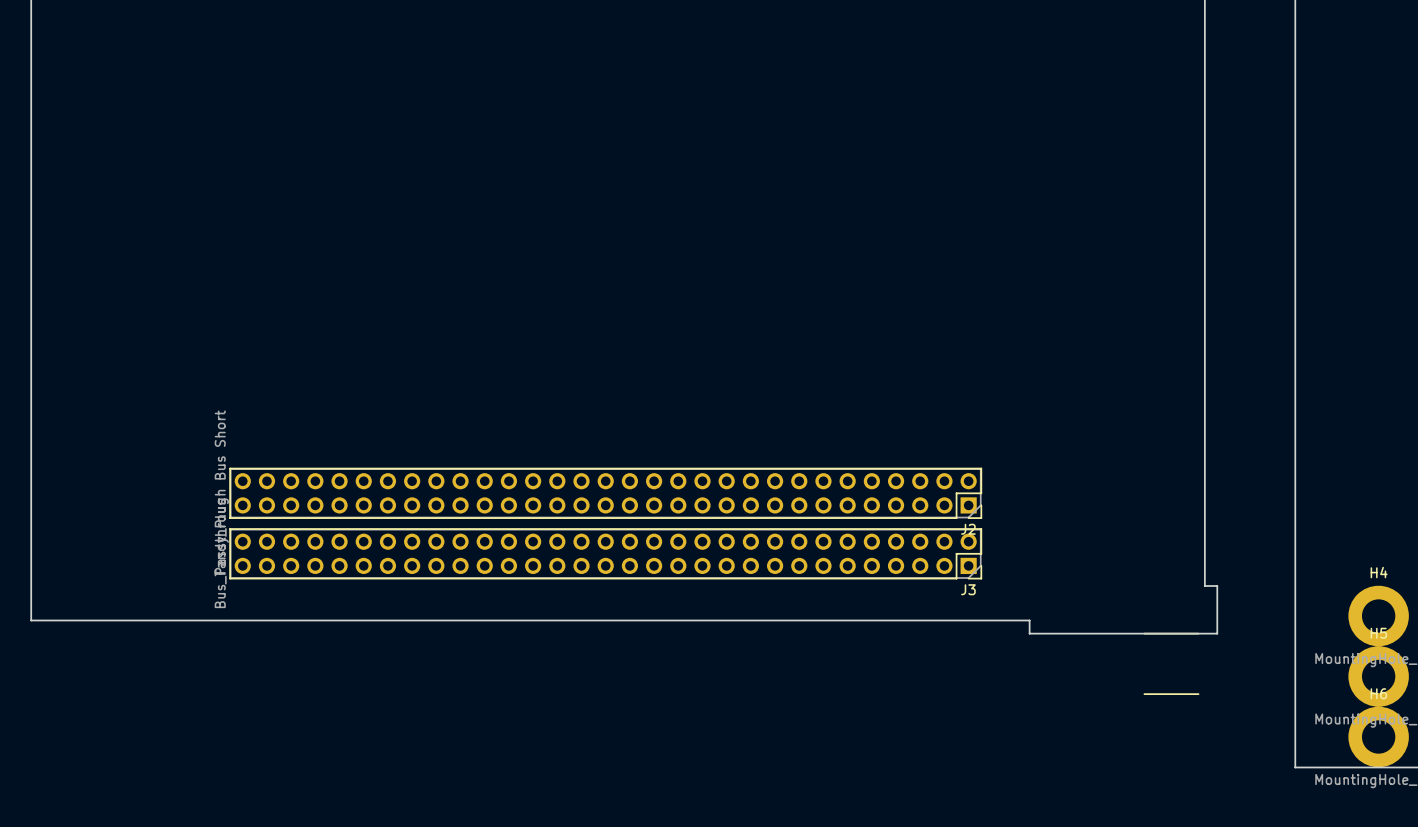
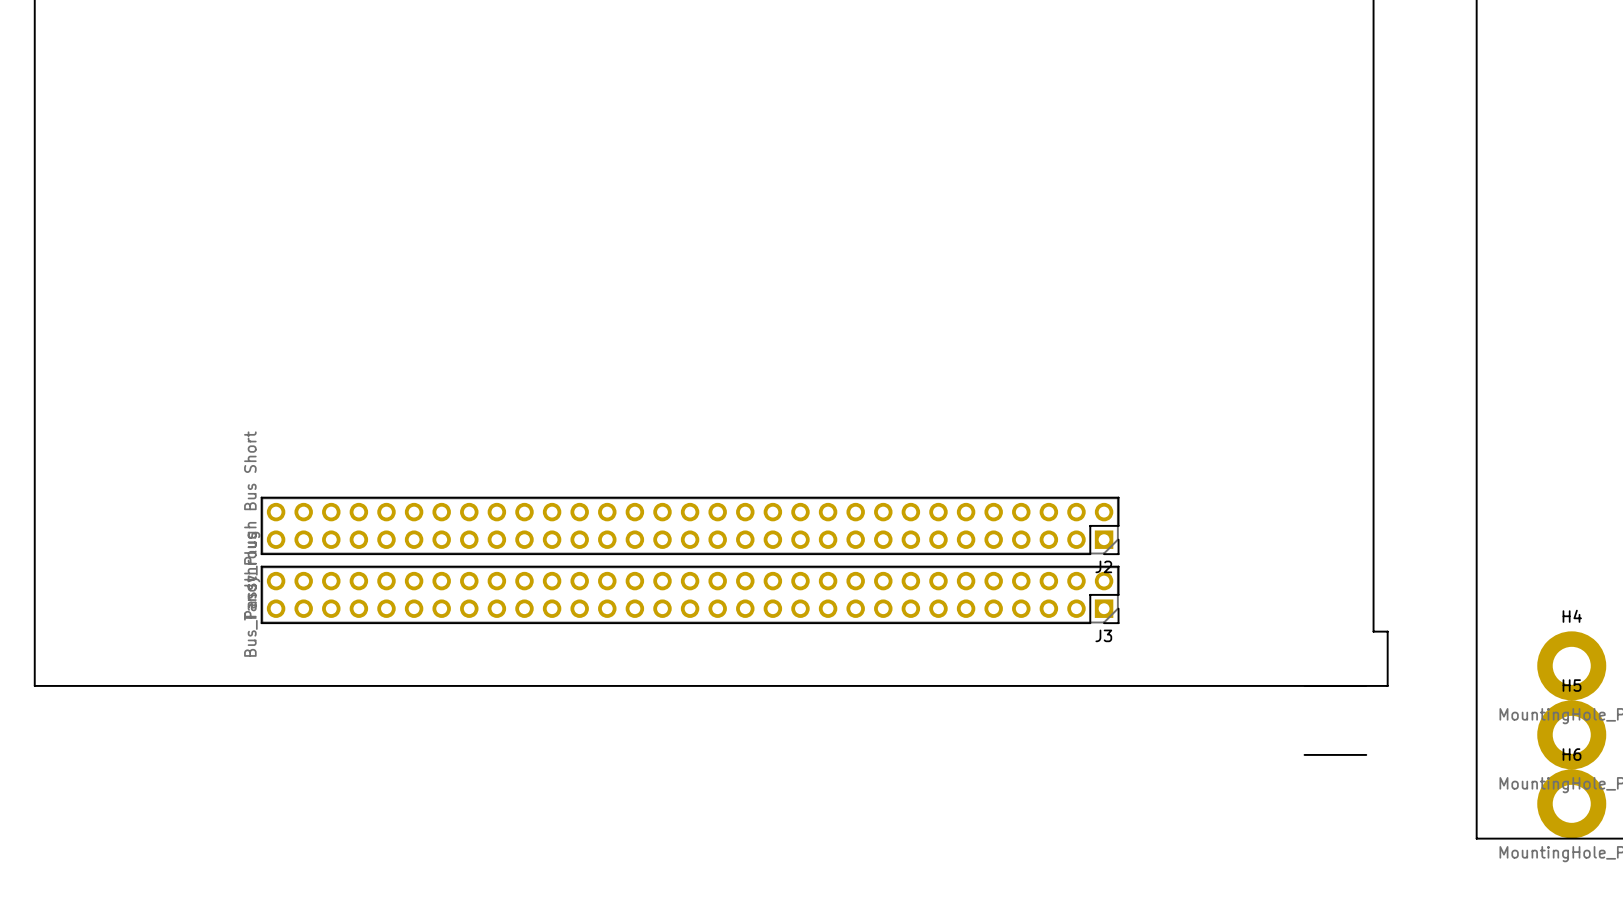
board edge: (31, 620) (1029, 620) (1029, 633) -> (34, 670) (34, 685) (1173, 685)

